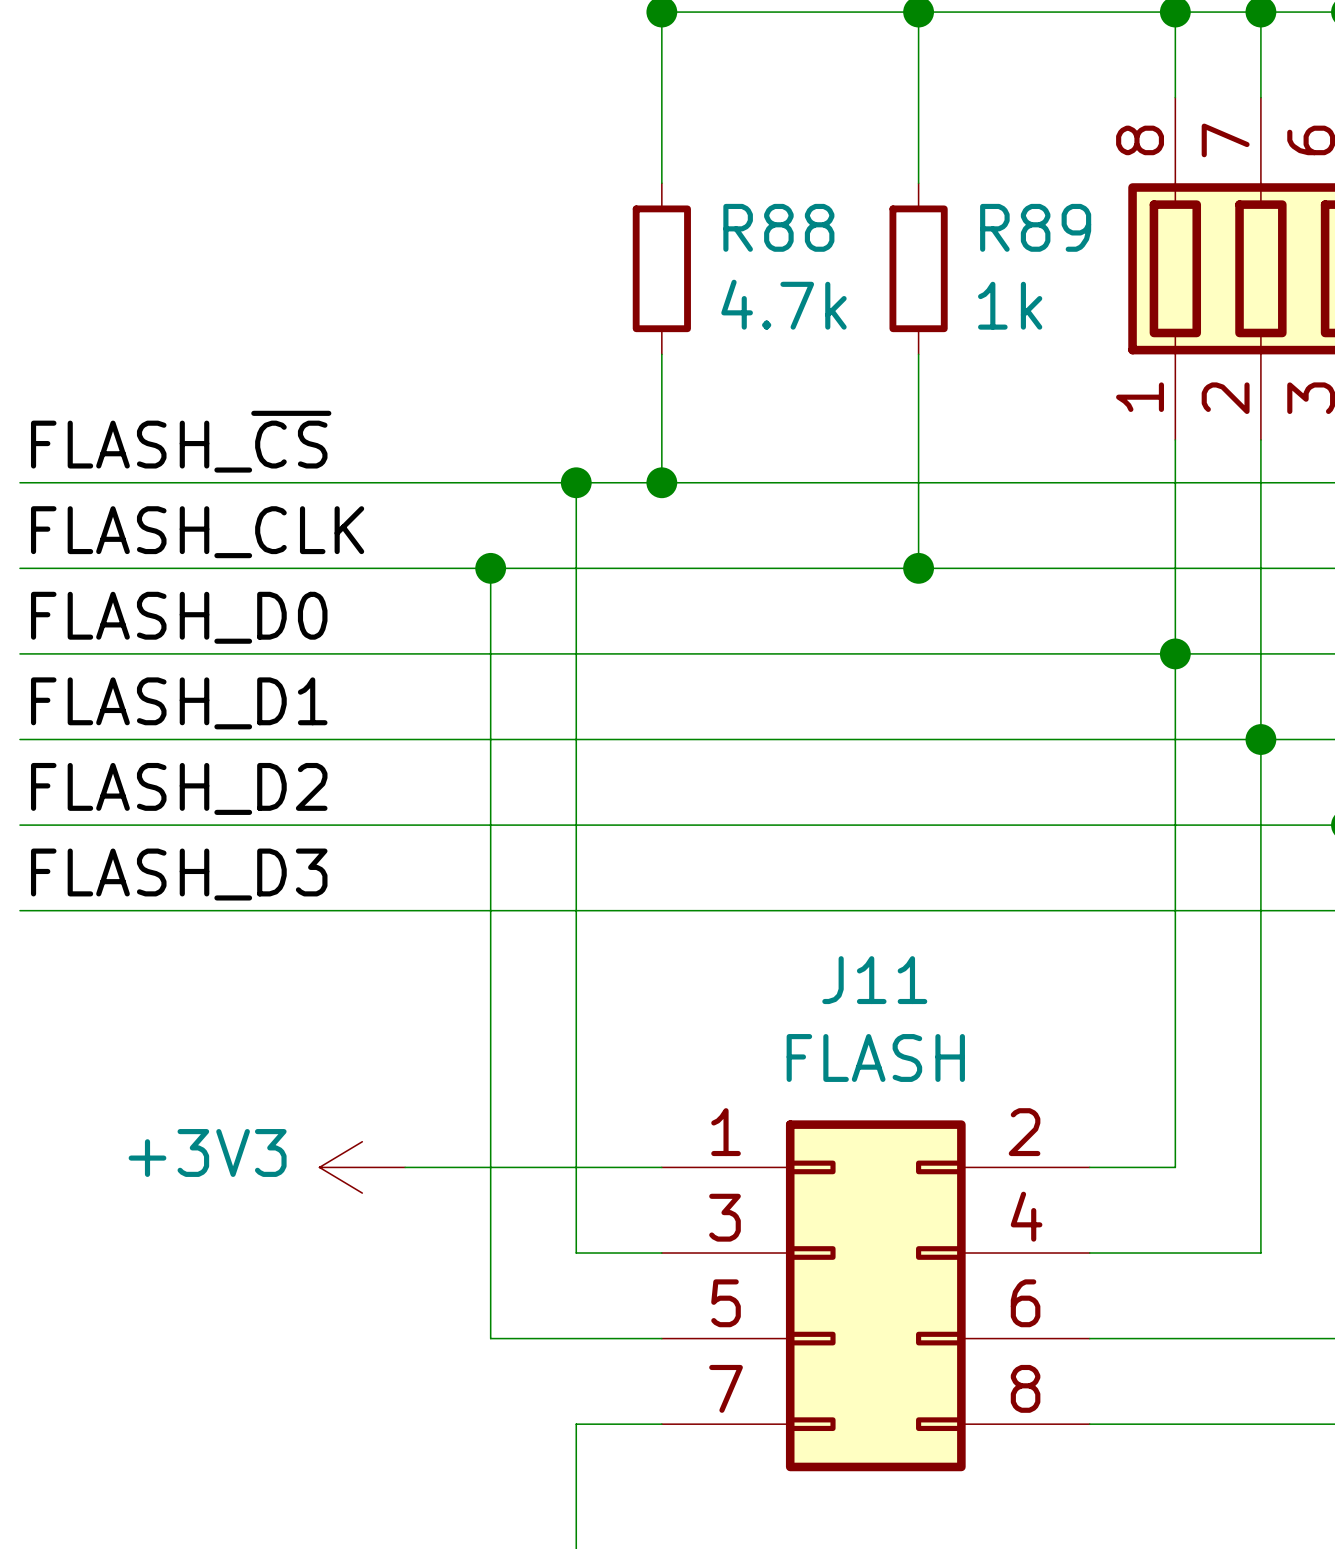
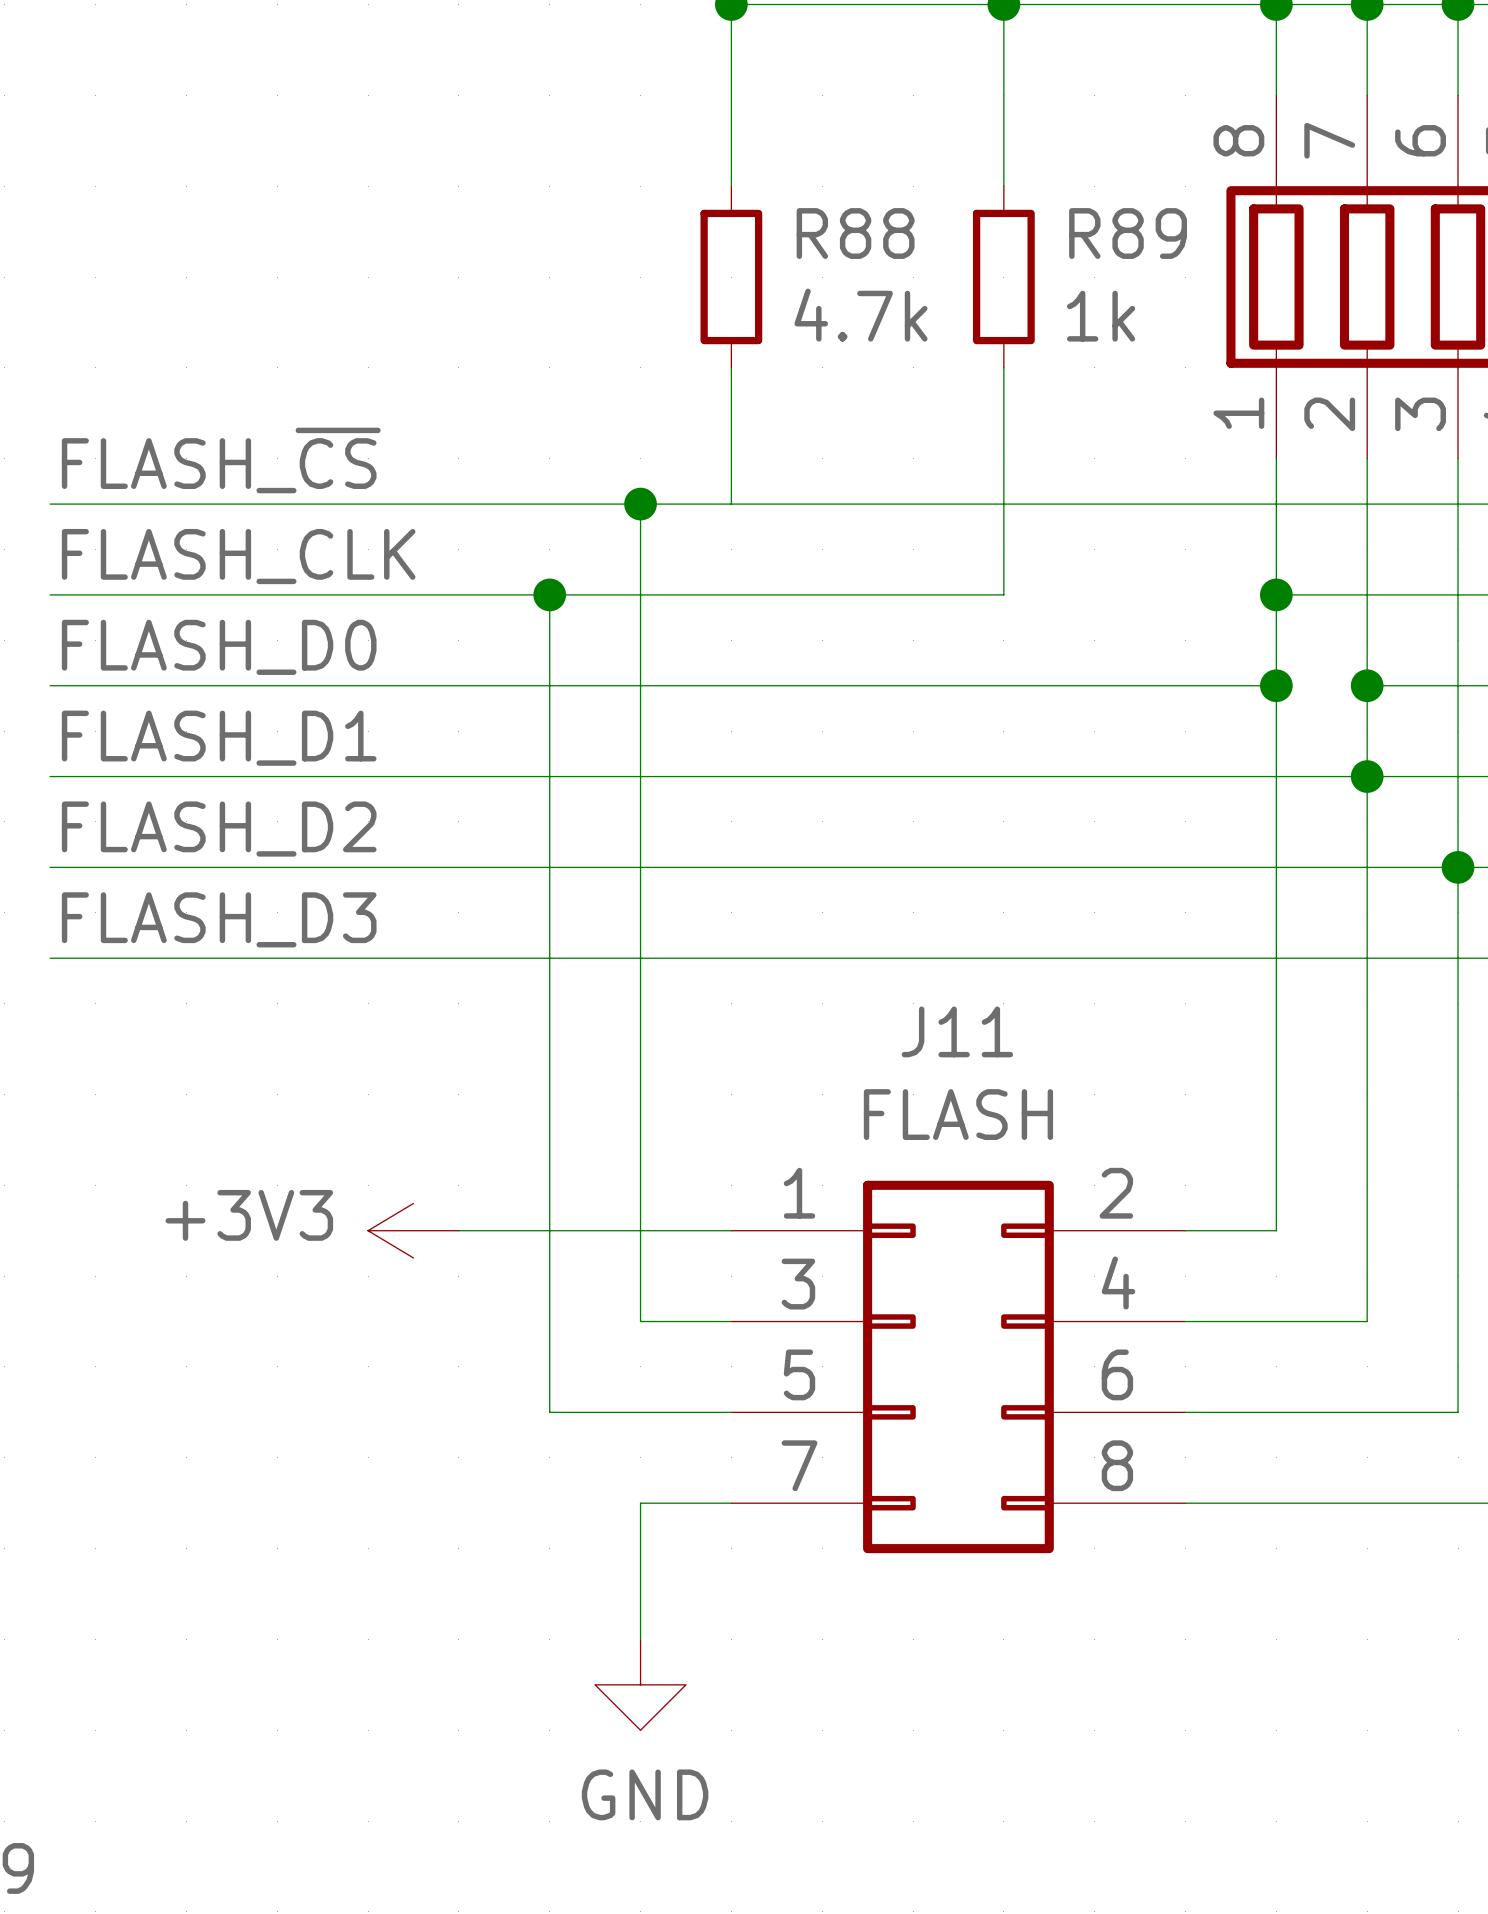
junction: (661, 482) -> none
wire: (918, 568) (1175, 568) -> none
junction: (918, 568) -> none
junction: none -> (1276, 594)
wire: (1175, 653) (1260, 653) -> none
junction: none -> (1367, 685)

